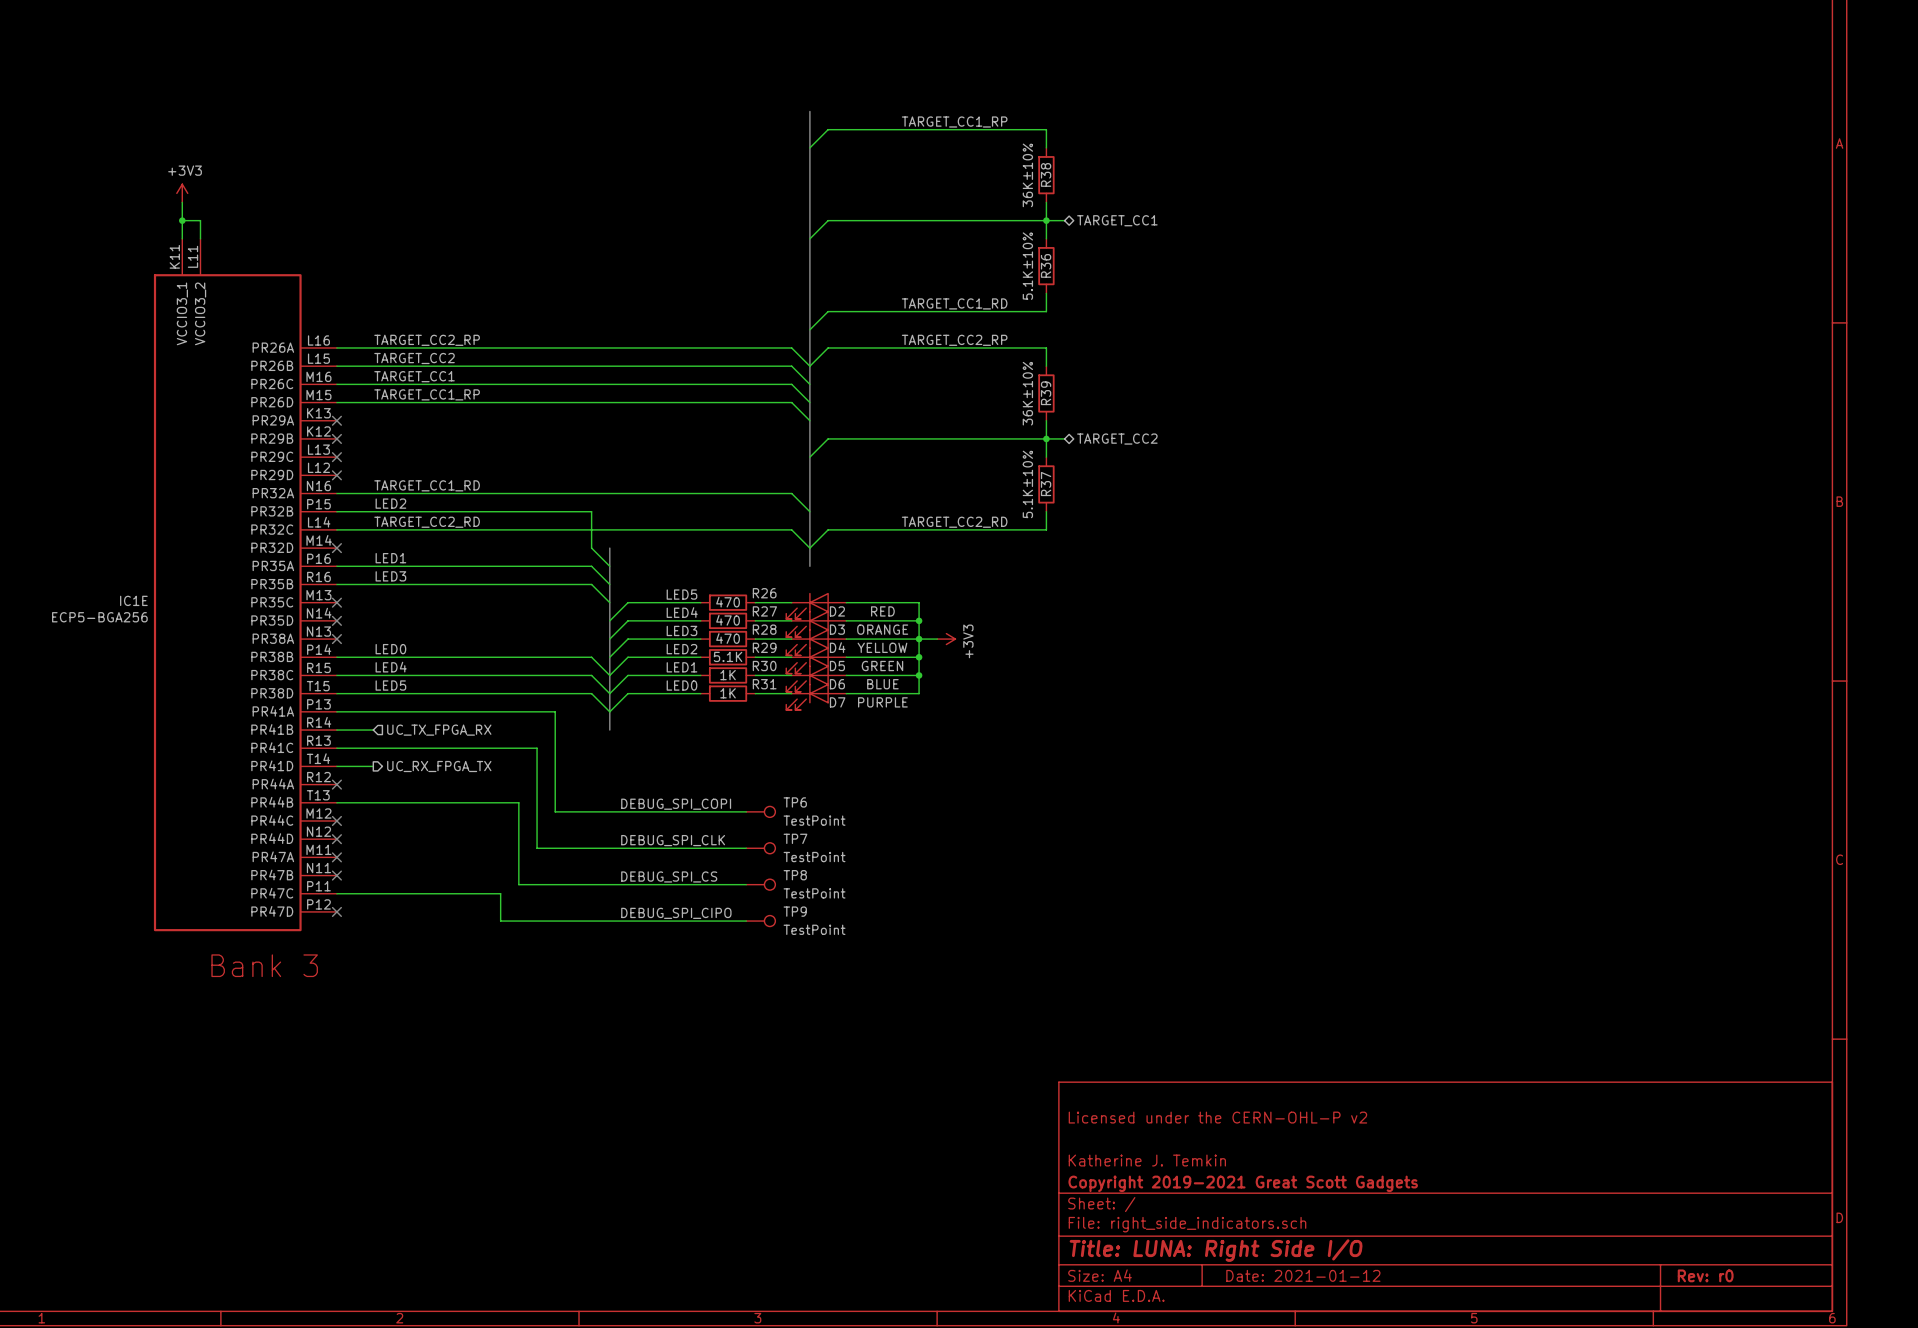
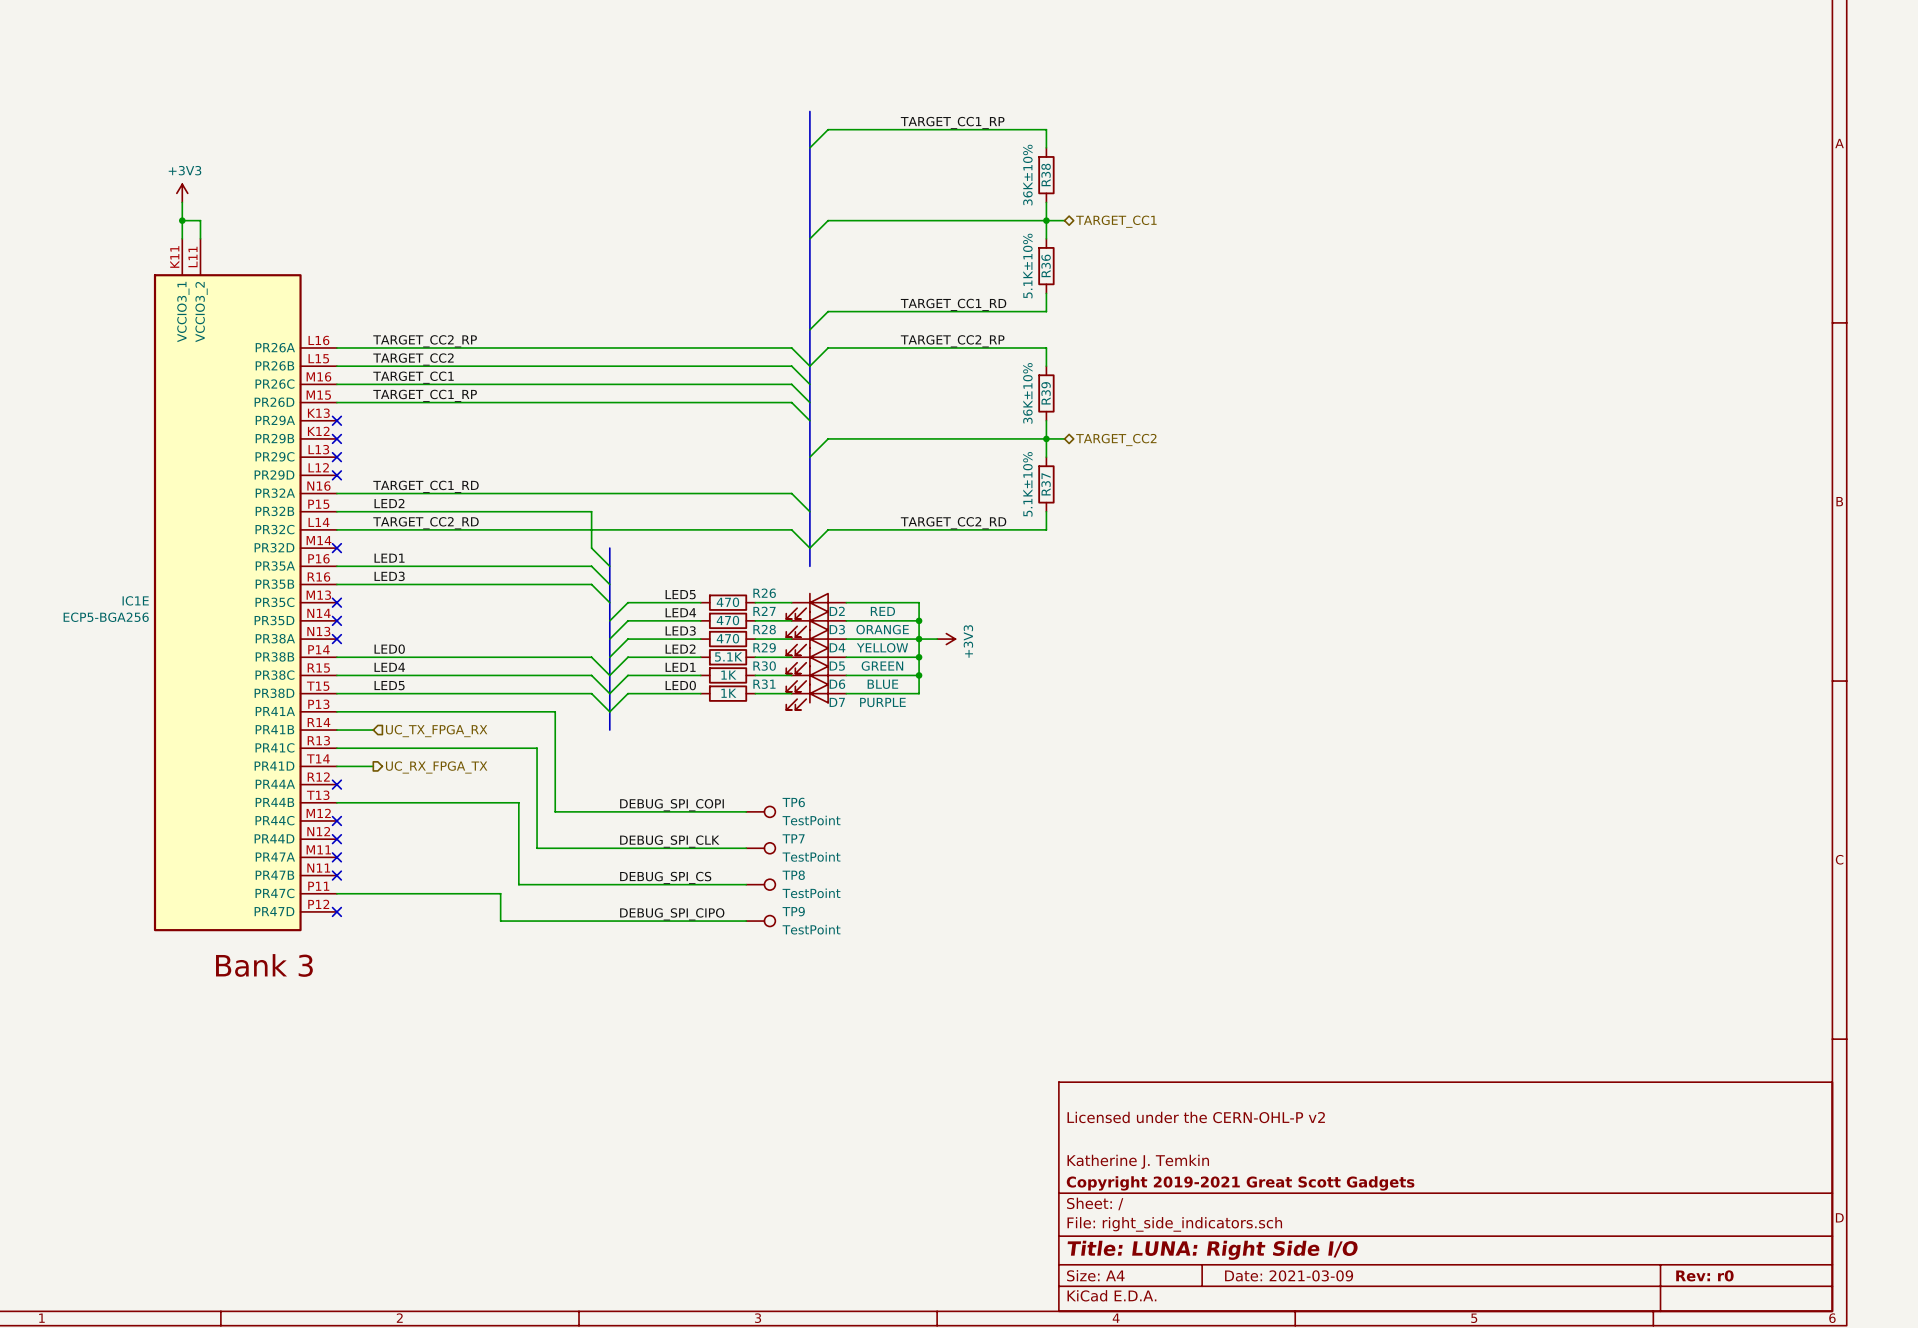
title block: Date: 2021-01-12 (1303, 1275) -> Date: 2021-03-09 (1289, 1275)

